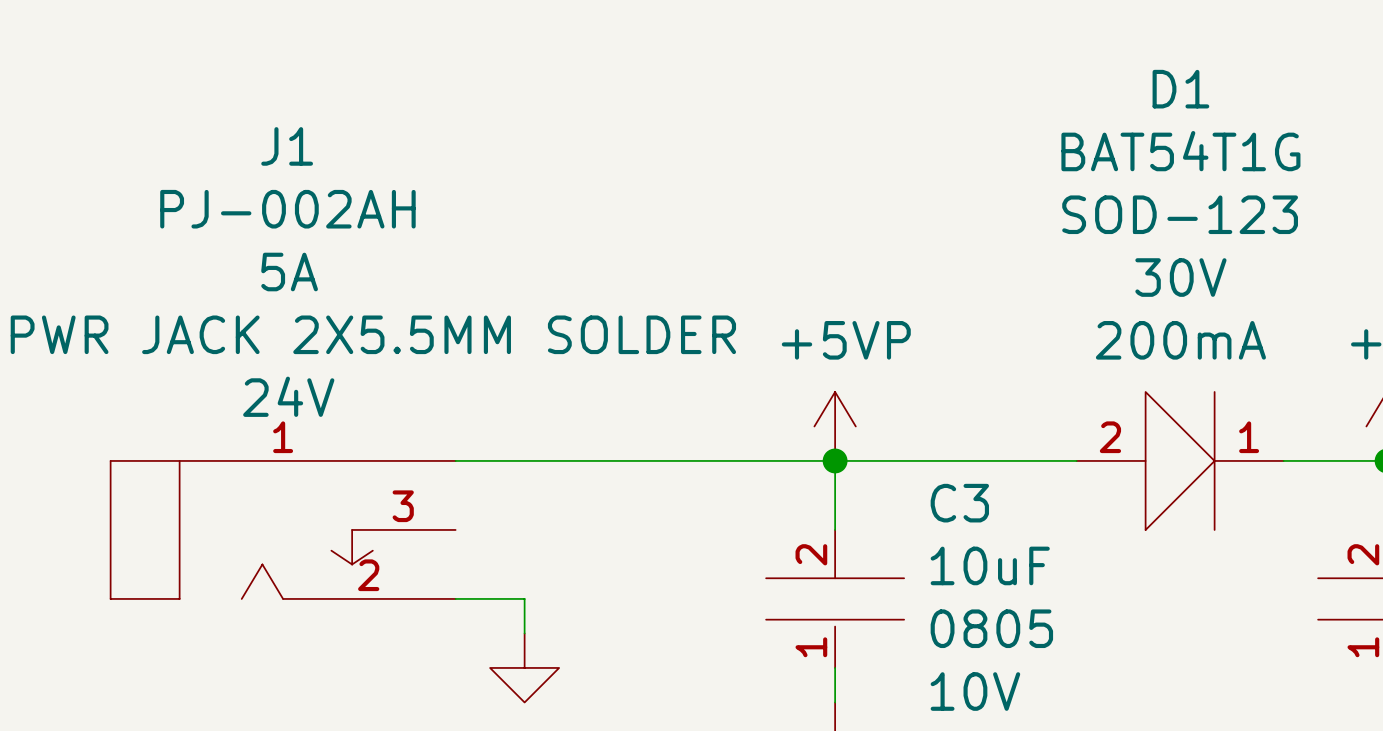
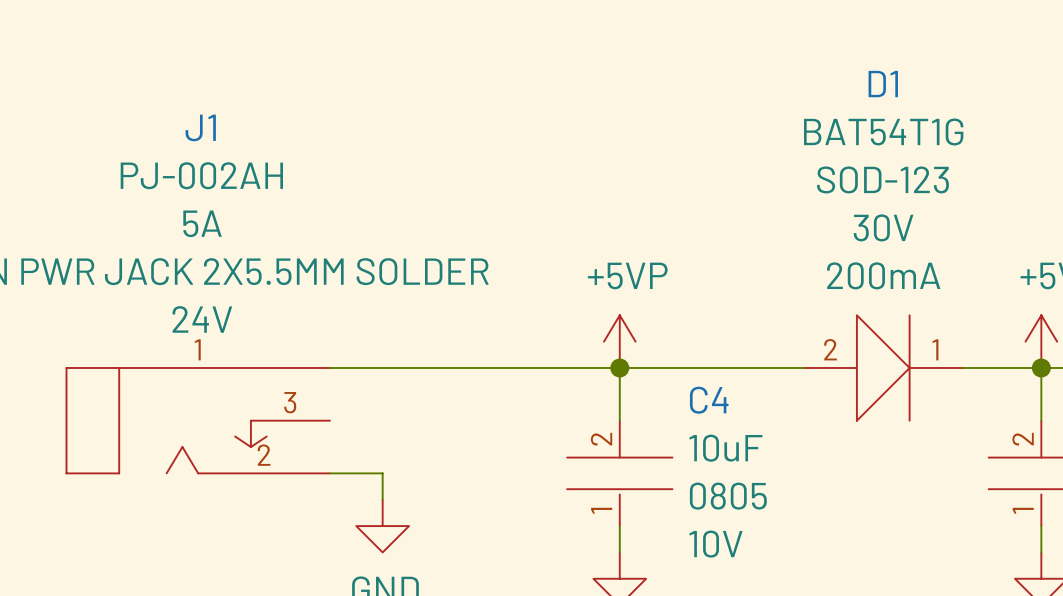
C3 name: C3 (959, 503) -> C4 (709, 400)

